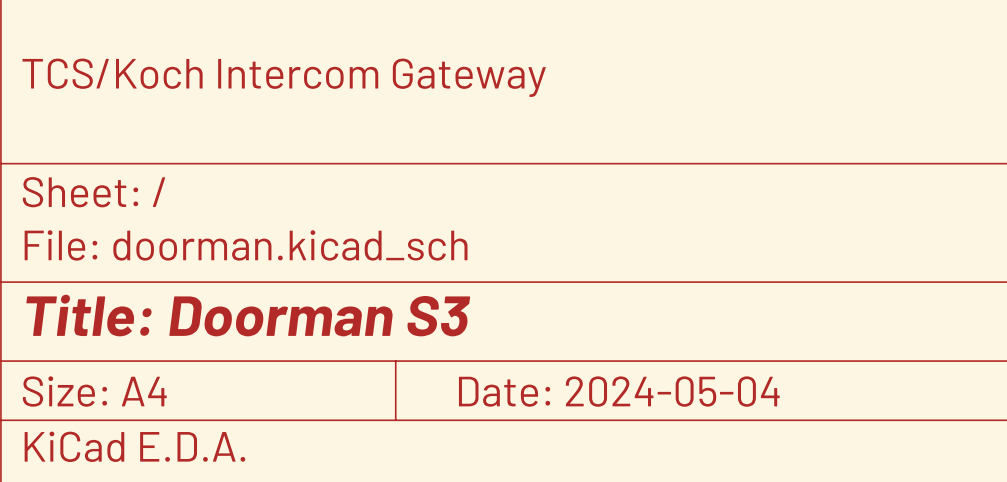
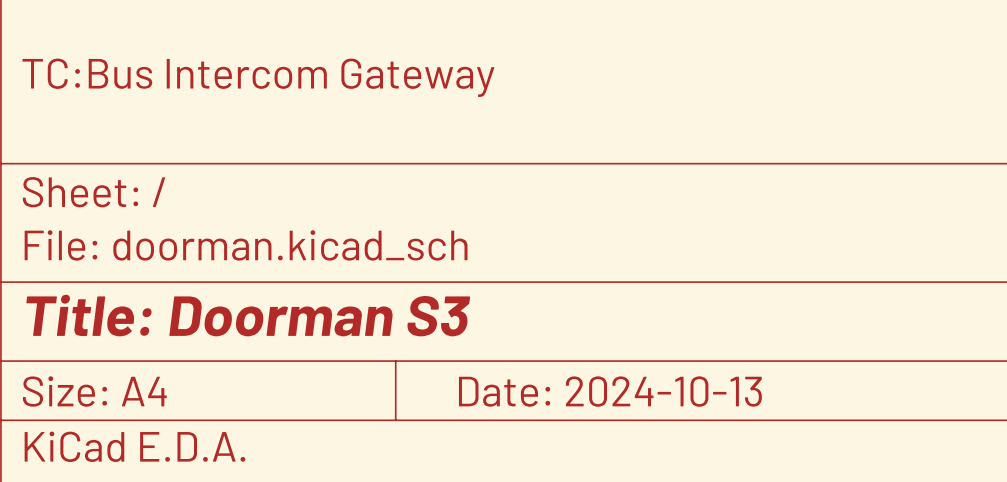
title block: TCS/Koch Intercom Gateway (284, 77) -> TC:Bus Intercom Gateway (258, 77)
title block: Date: 2024-05-04 (619, 391) -> Date: 2024-10-13 (610, 391)

